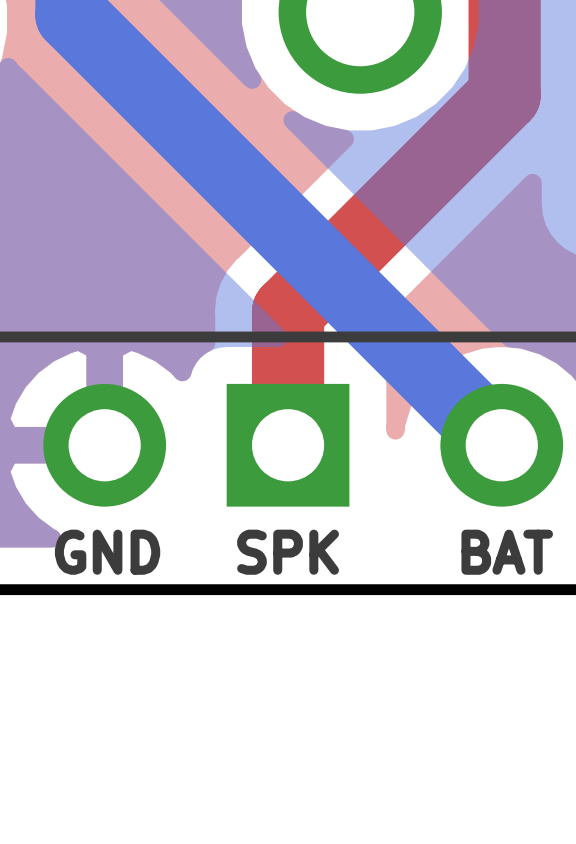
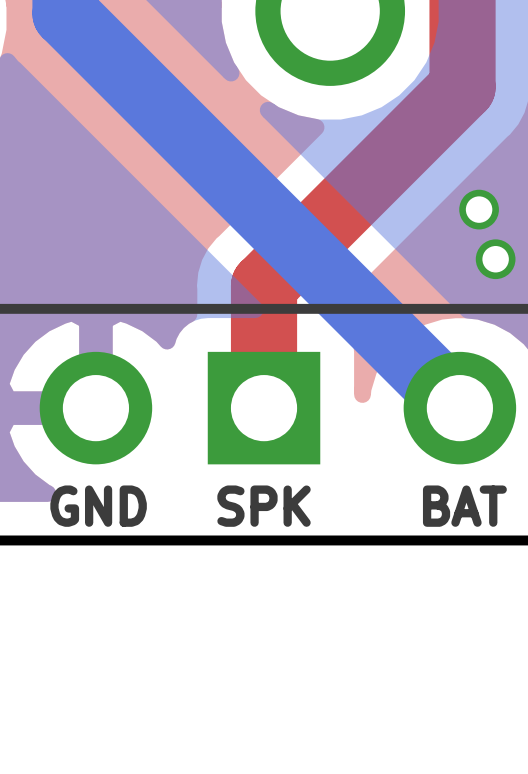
via: none -> (479, 209)
via: none -> (495, 259)

